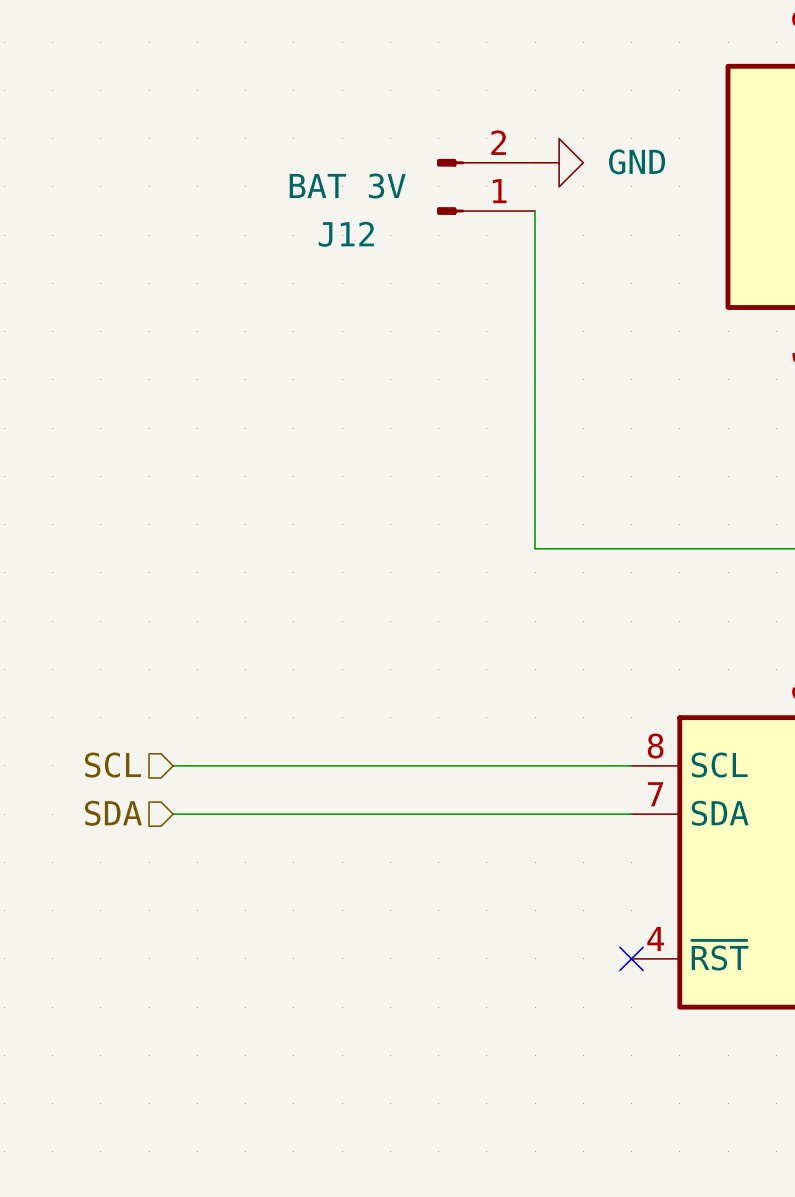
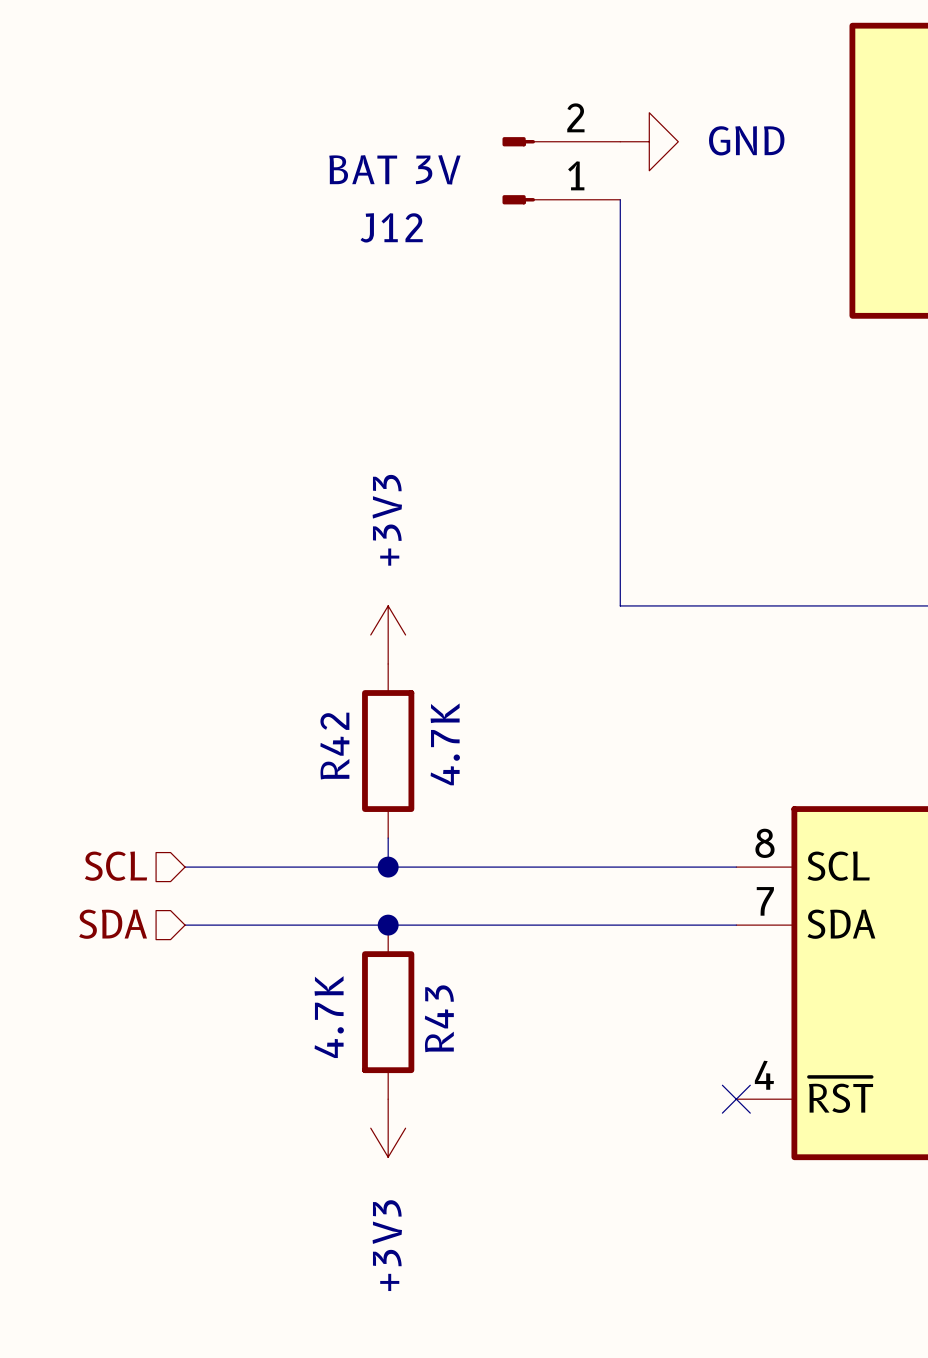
power symbol: none -> +3V3 (388, 634)
R42: none -> 4.7K (388, 751)
wire: none -> (388, 838) (388, 867)
junction: none -> (388, 867)
junction: none -> (388, 925)
R43: none -> 4.7K (388, 1012)
power symbol: none -> +3V3 (388, 1128)

